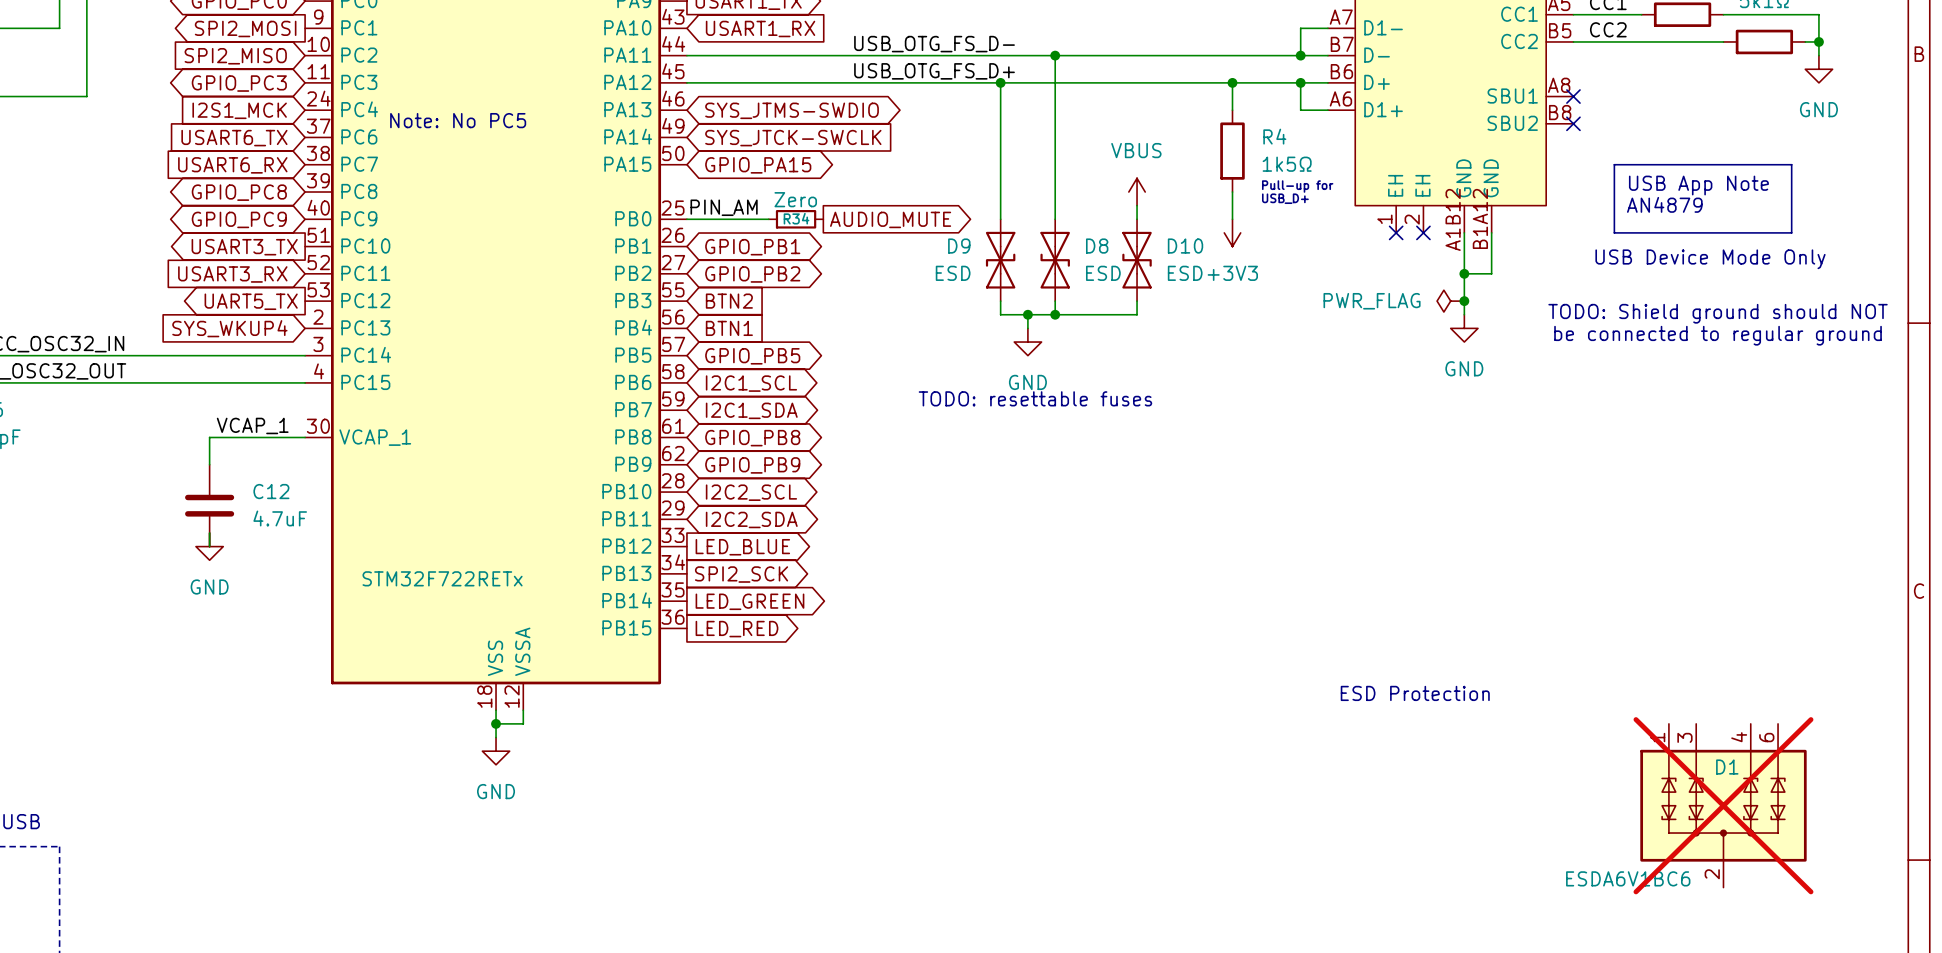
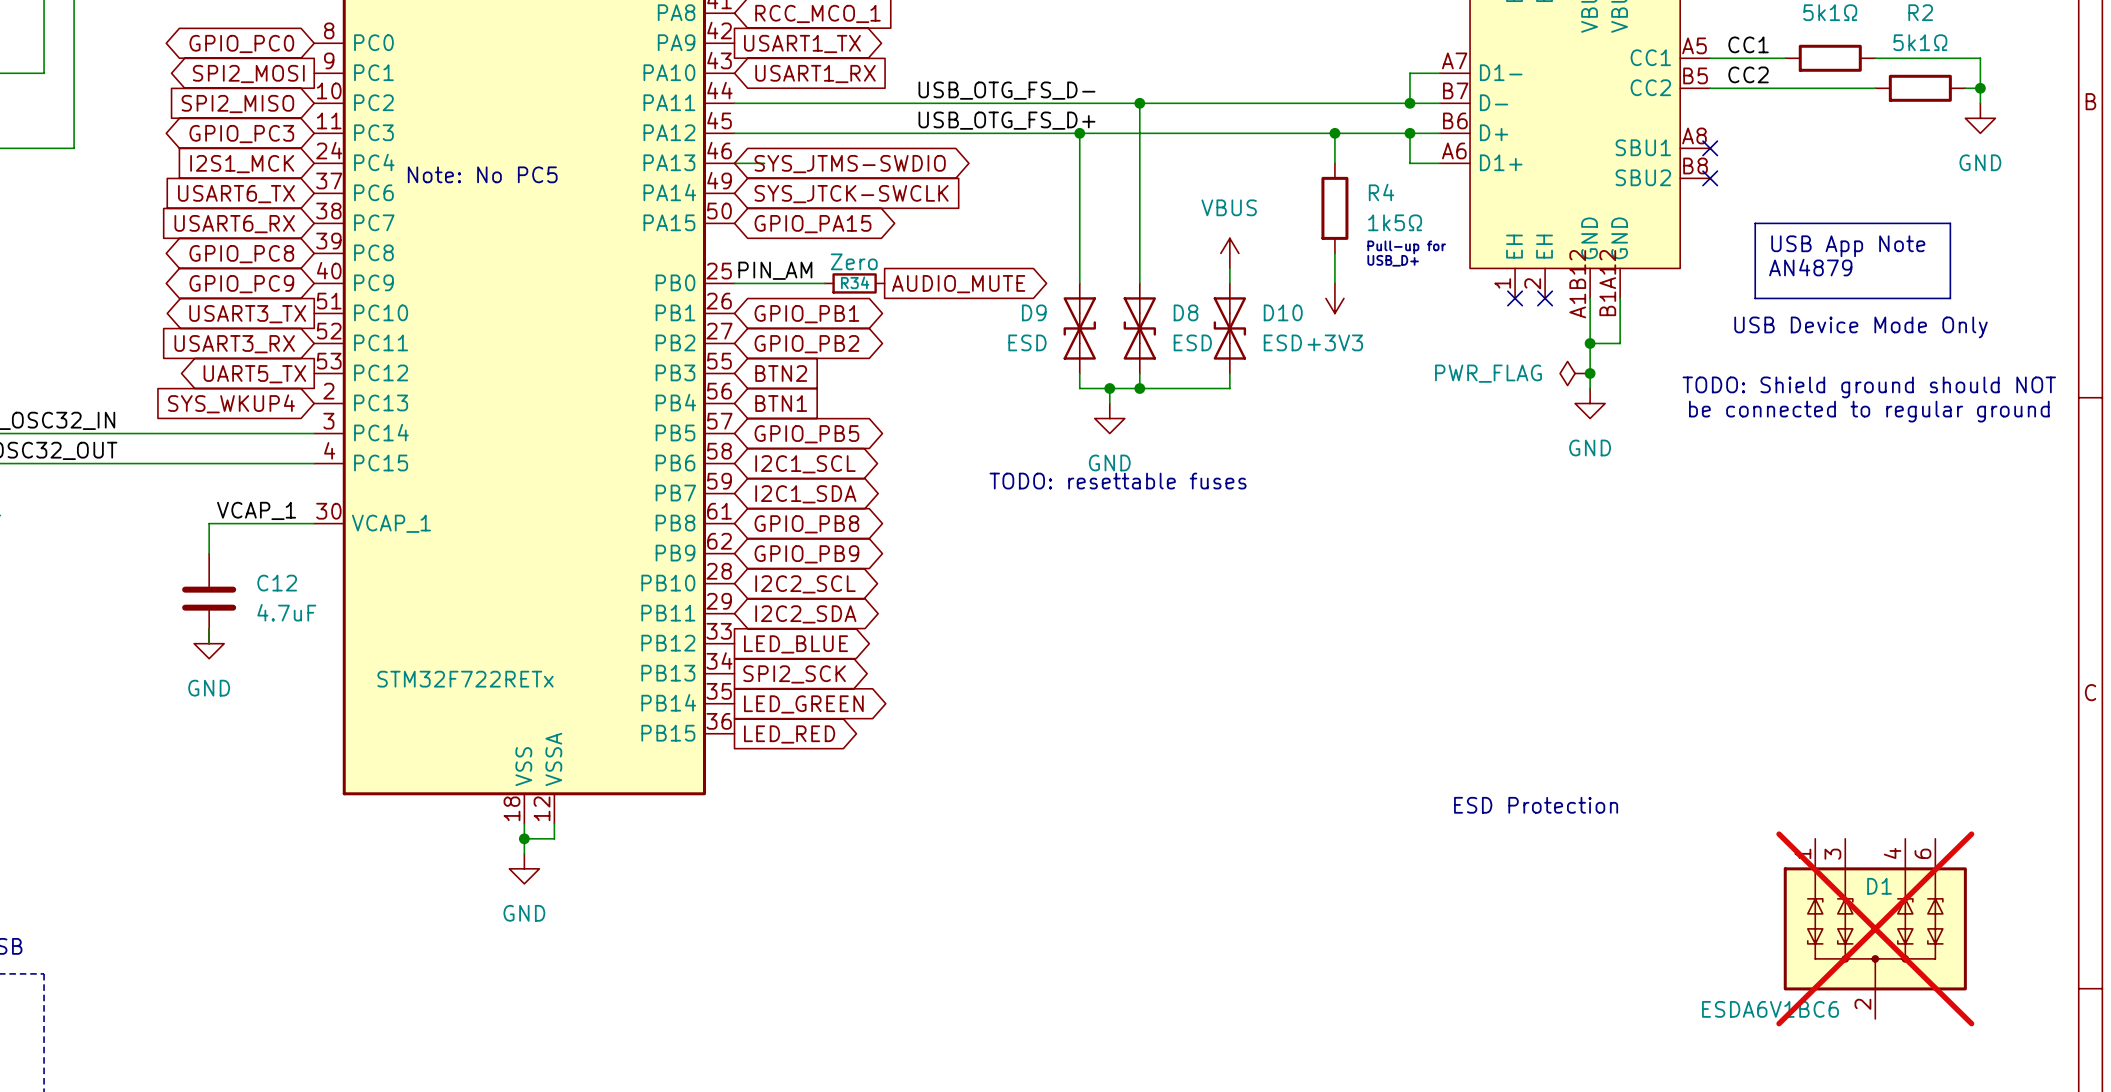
wire: none -> (734, 163) (764, 163)

